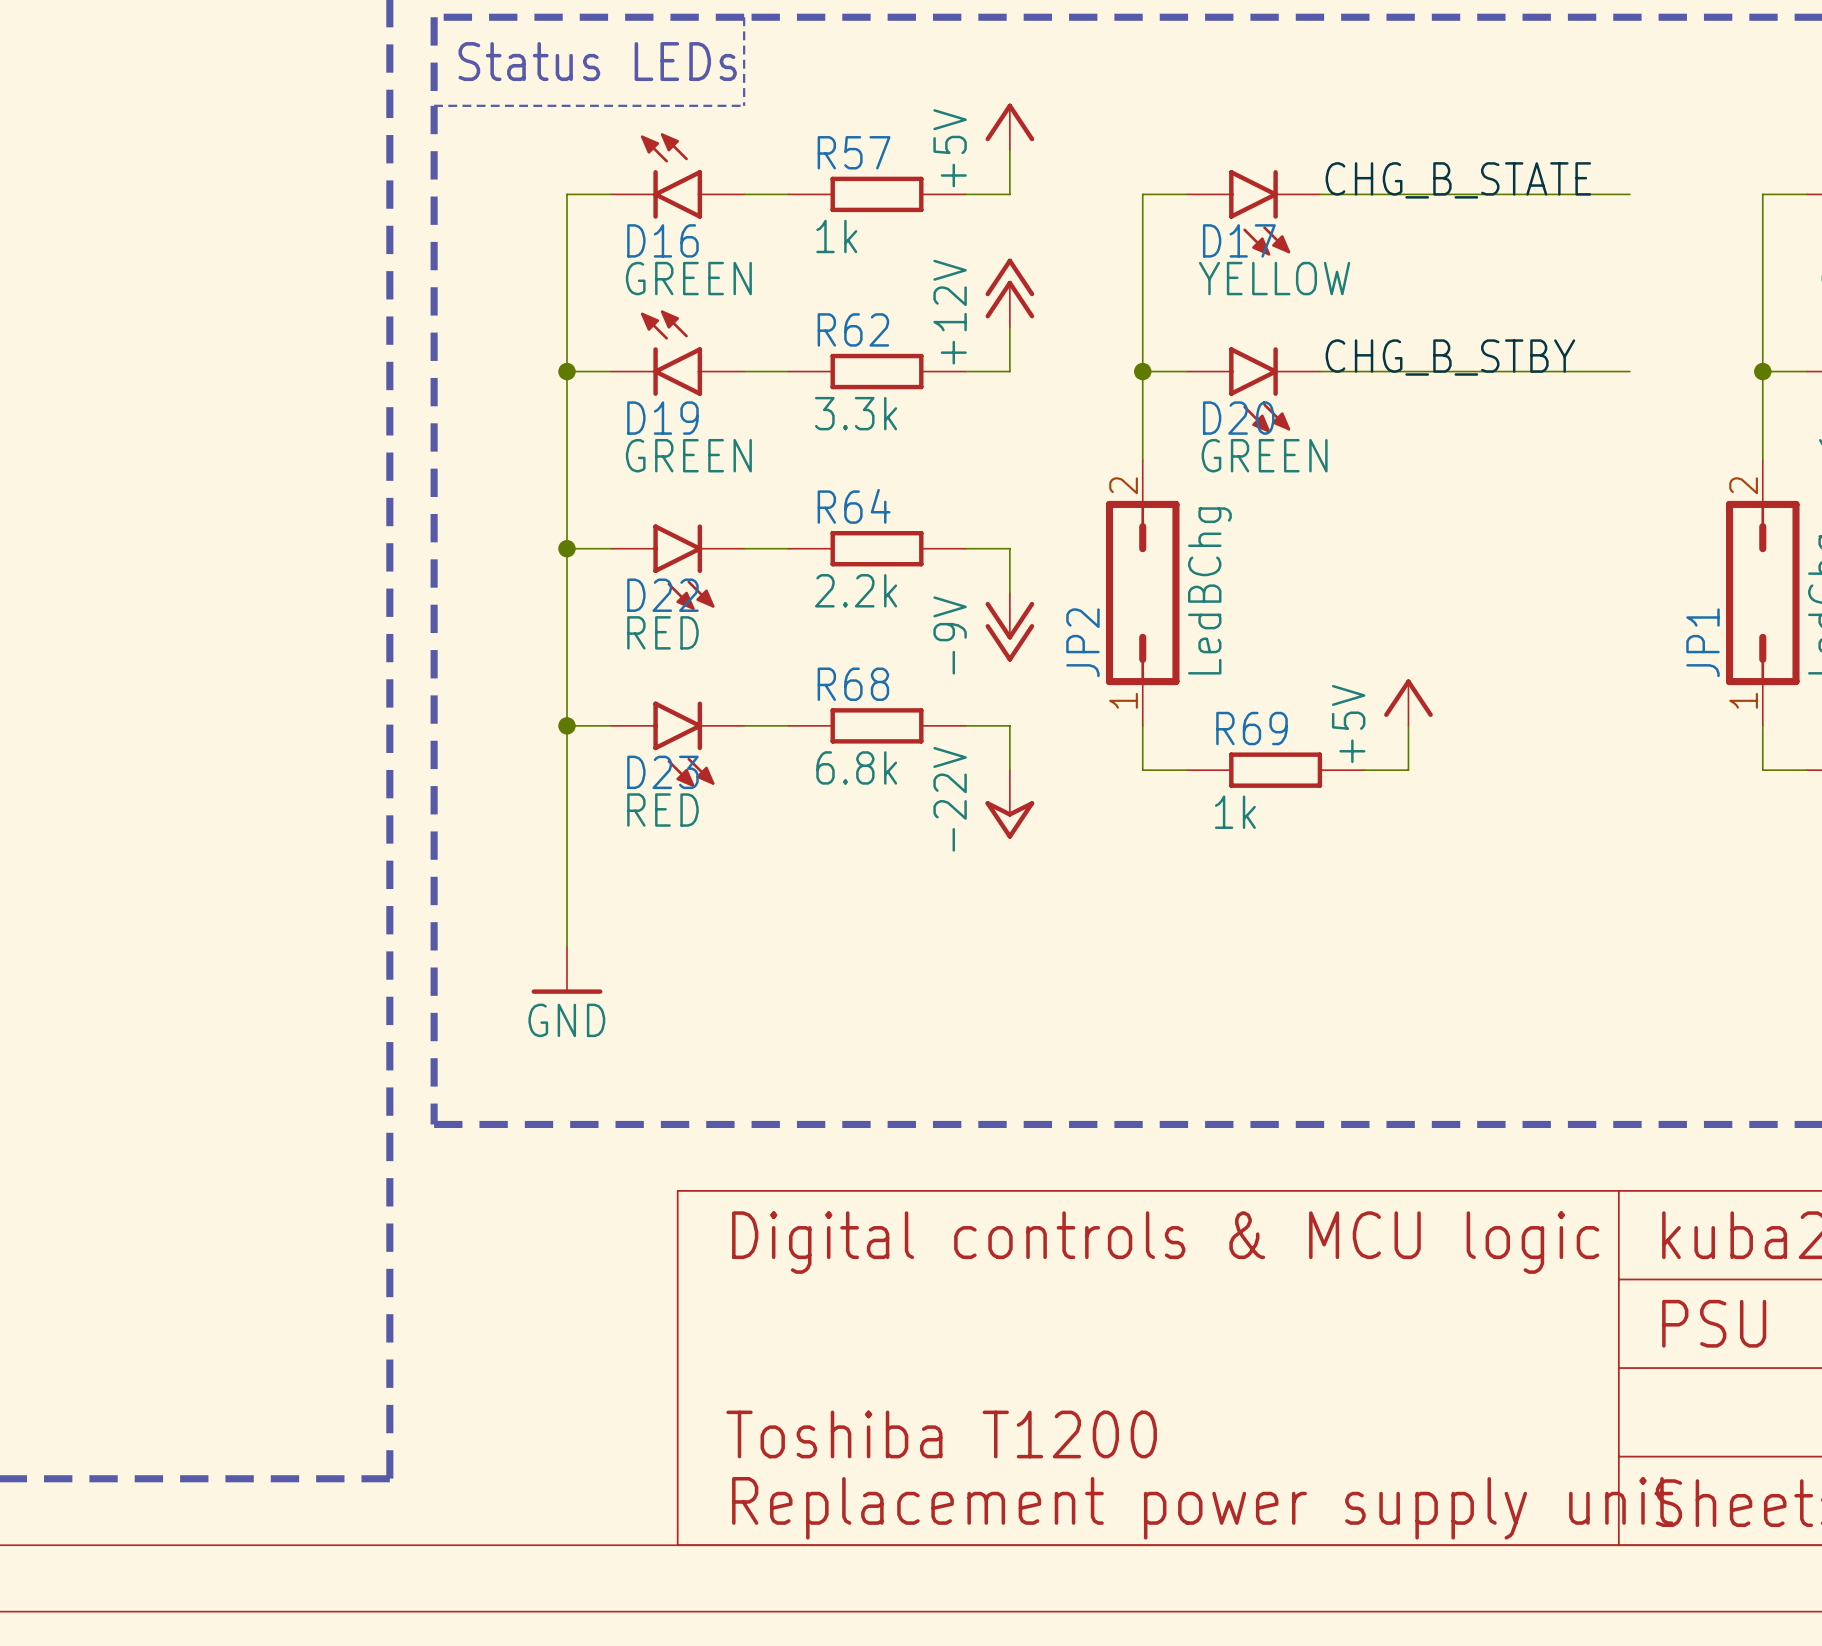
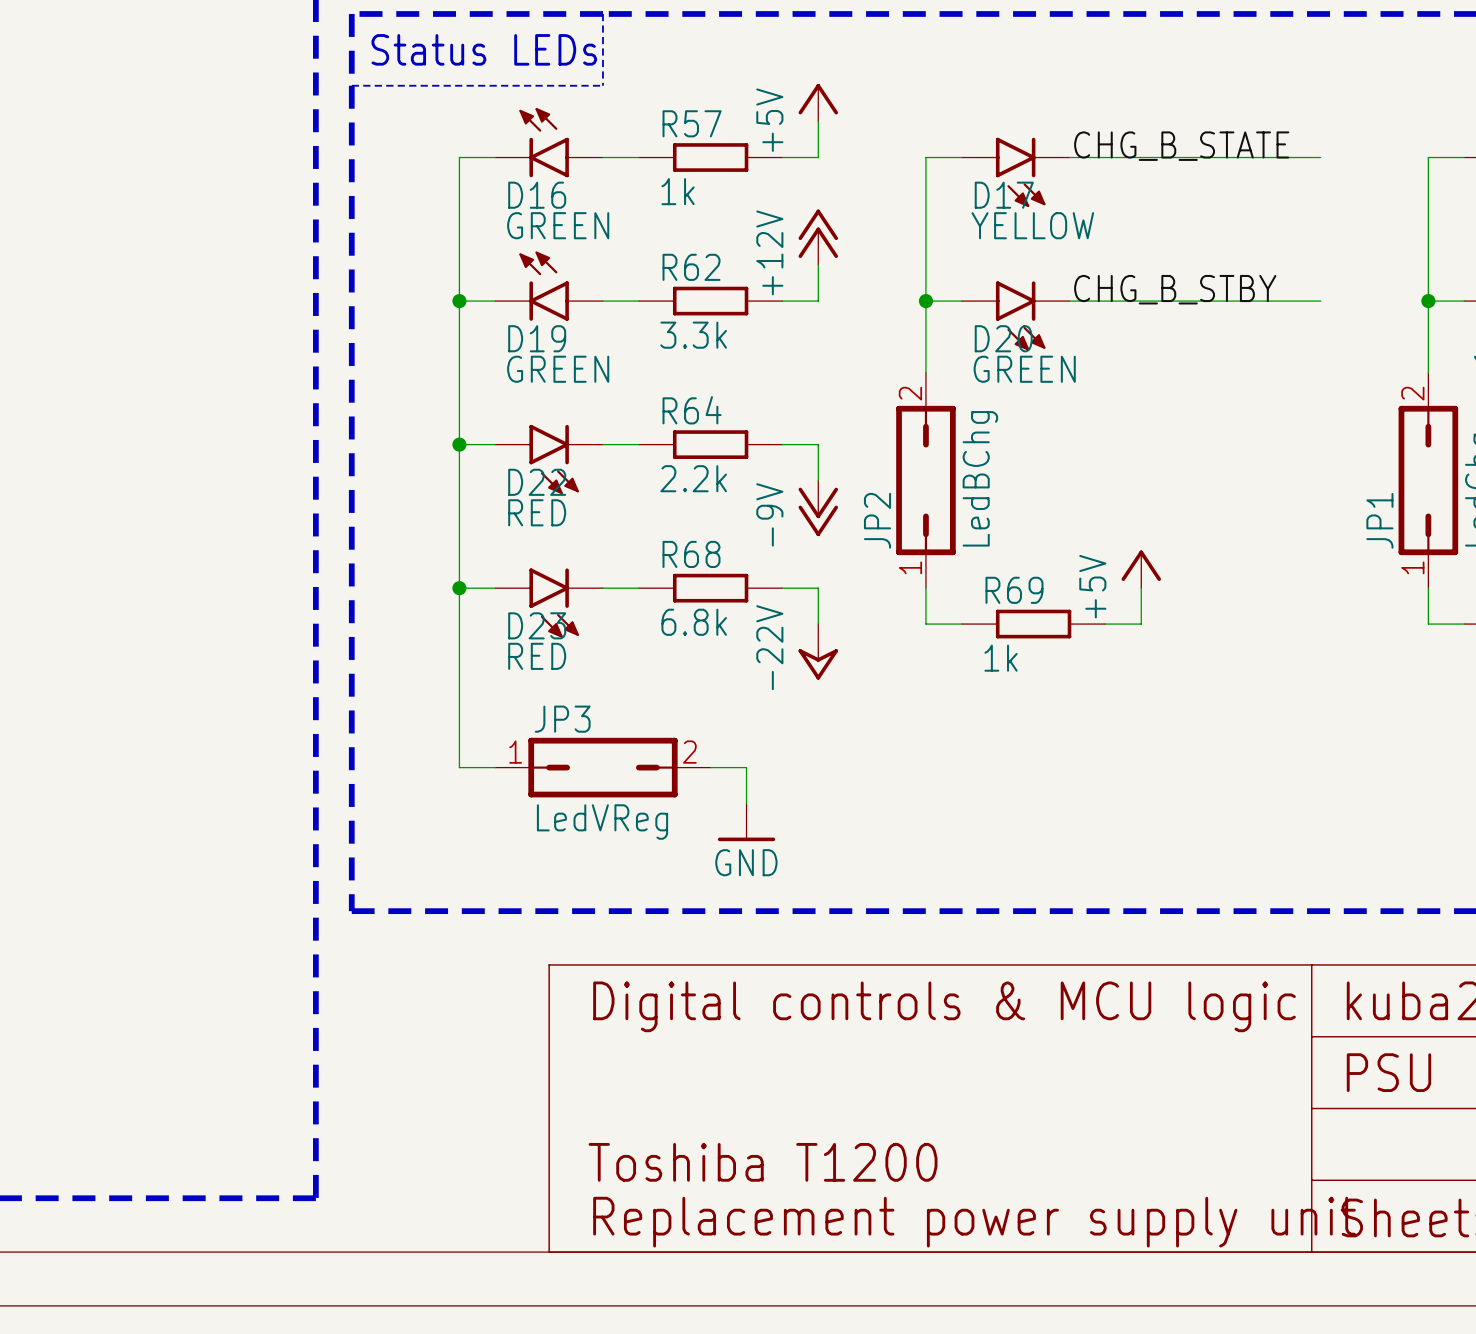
wire: none -> (459, 767) (495, 767)
JP3: none -> LedVReg (602, 767)
wire: none -> (710, 767) (746, 767) (746, 803)
power symbol position: GND (566, 970) -> GND (746, 822)

